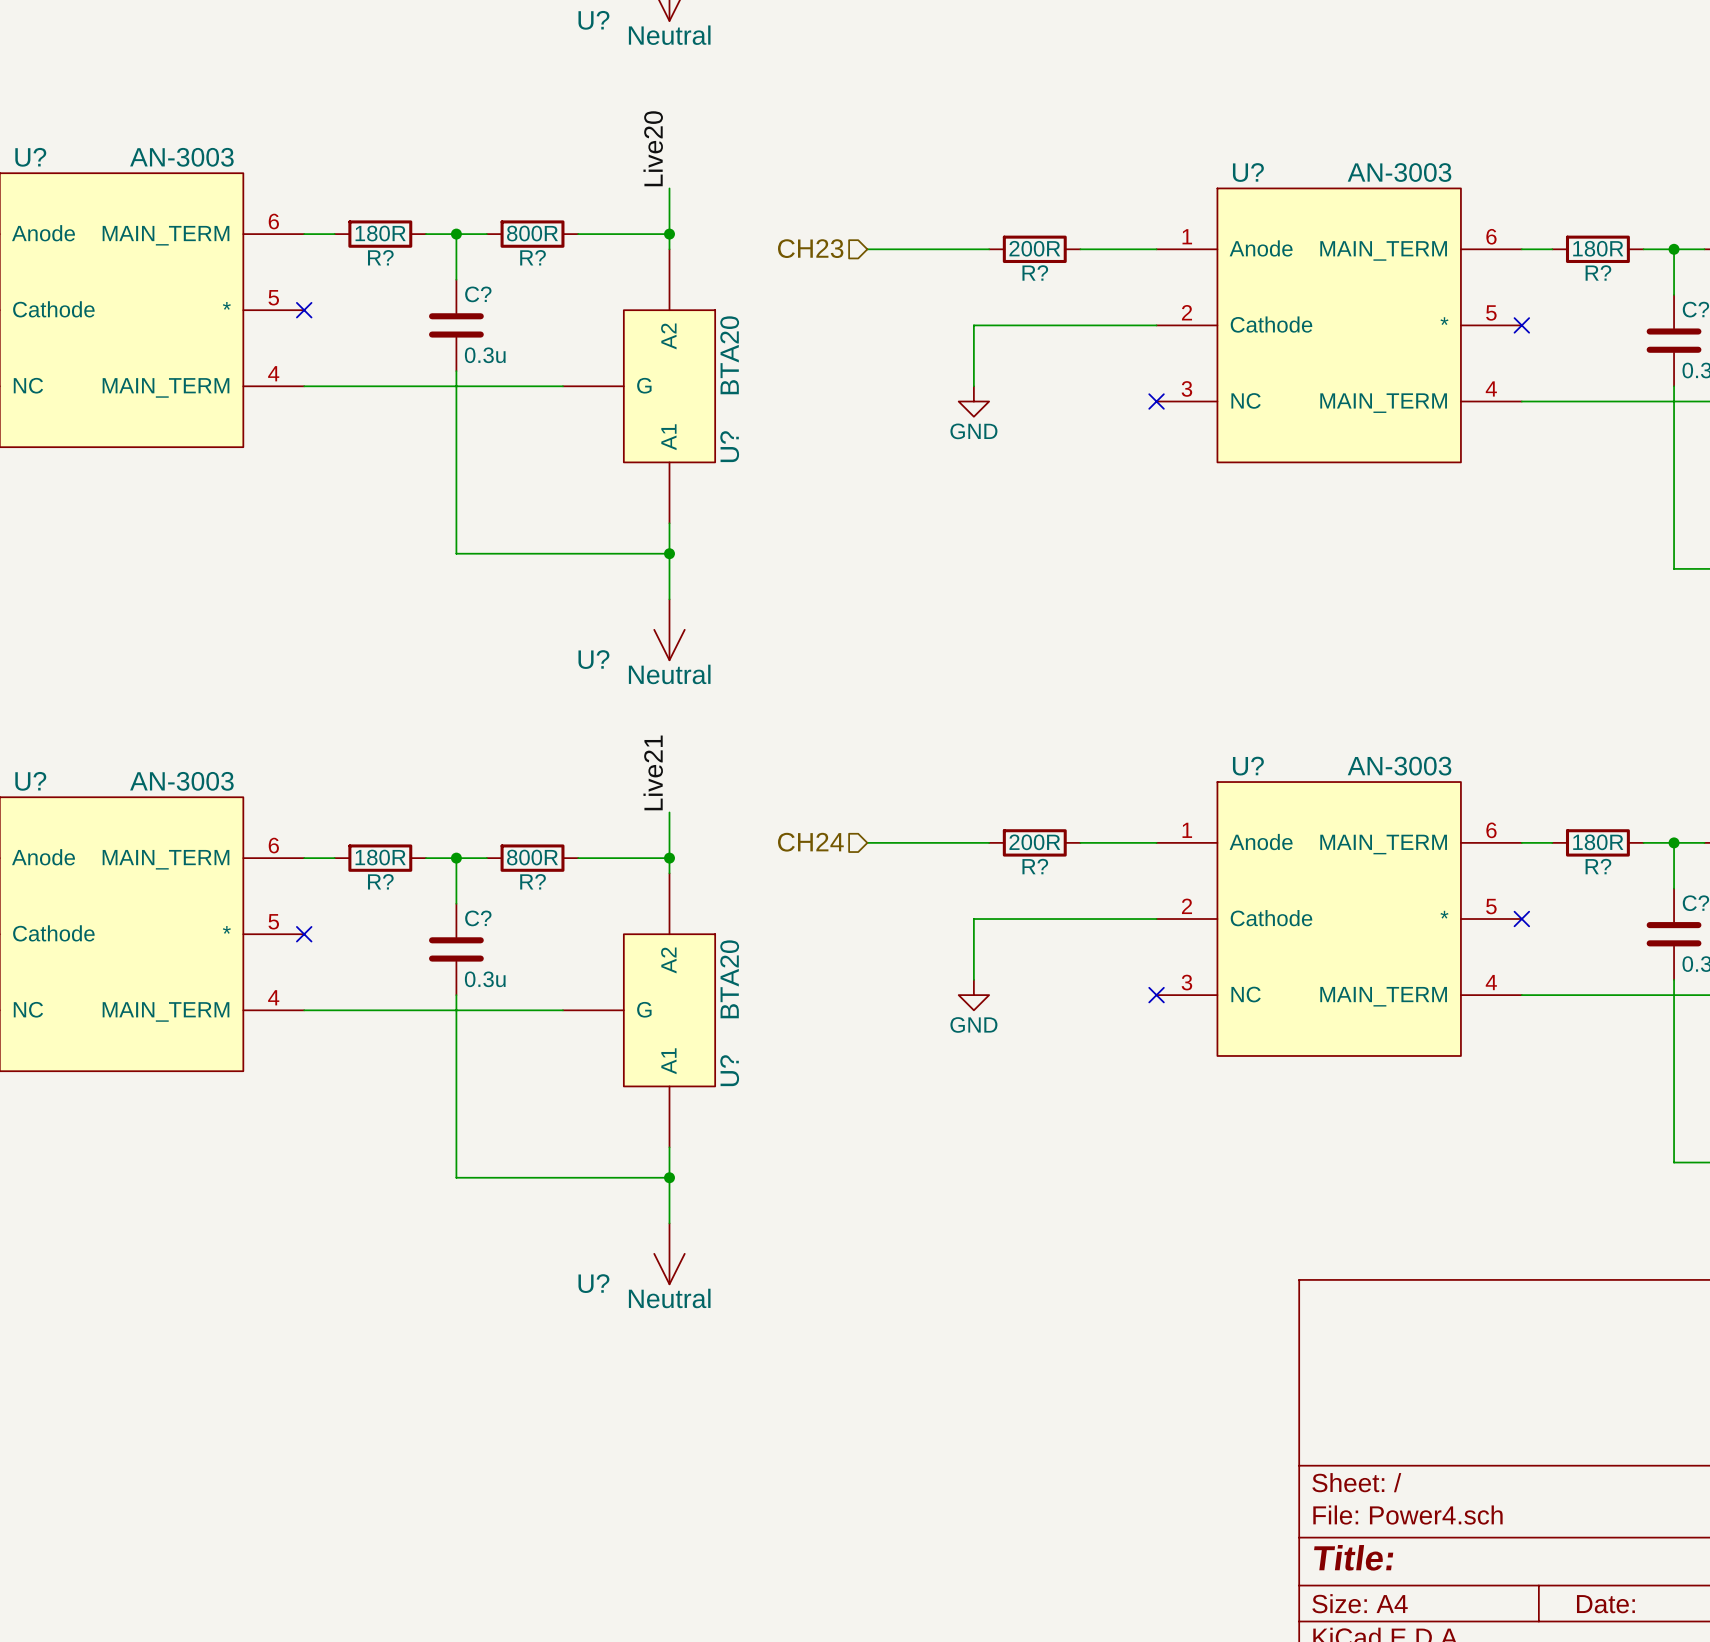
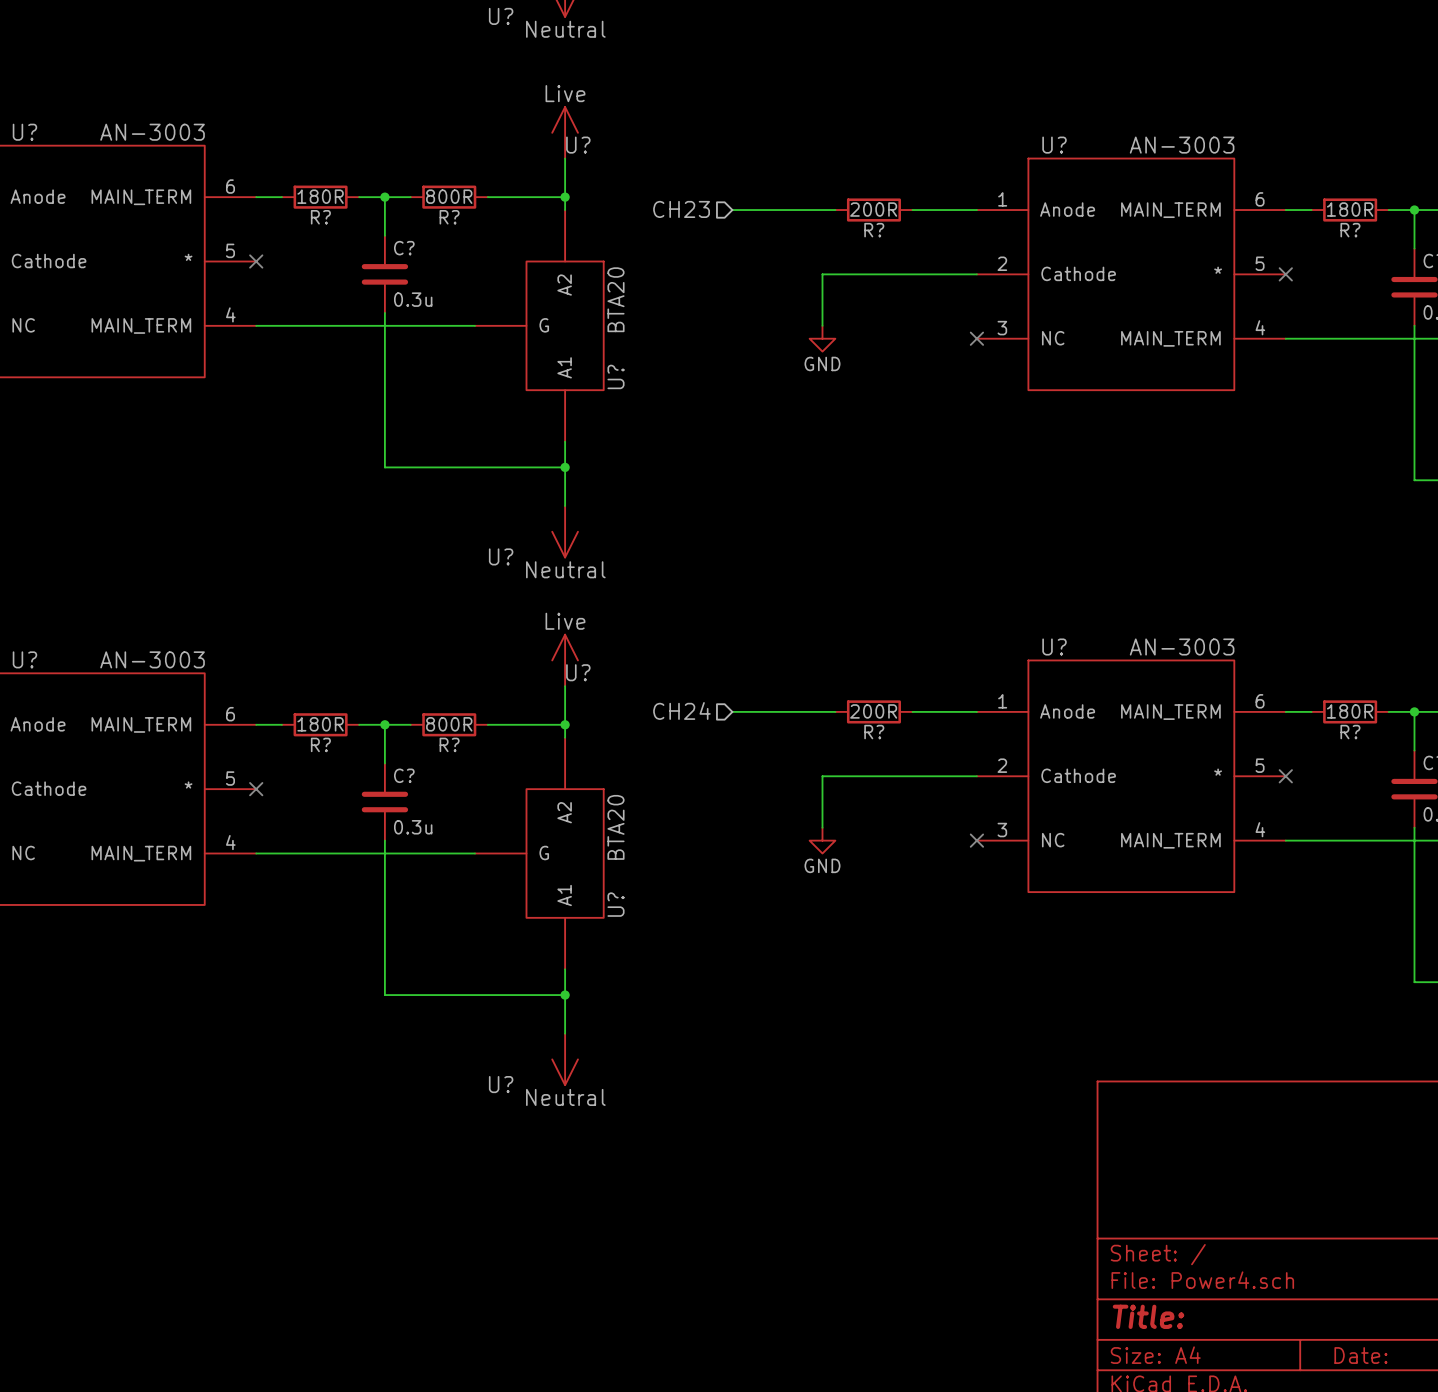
label: Live20 (653, 148) -> none
U?: none -> Live (565, 132)
label: Live21 (653, 772) -> none
U?: none -> Live (565, 660)

